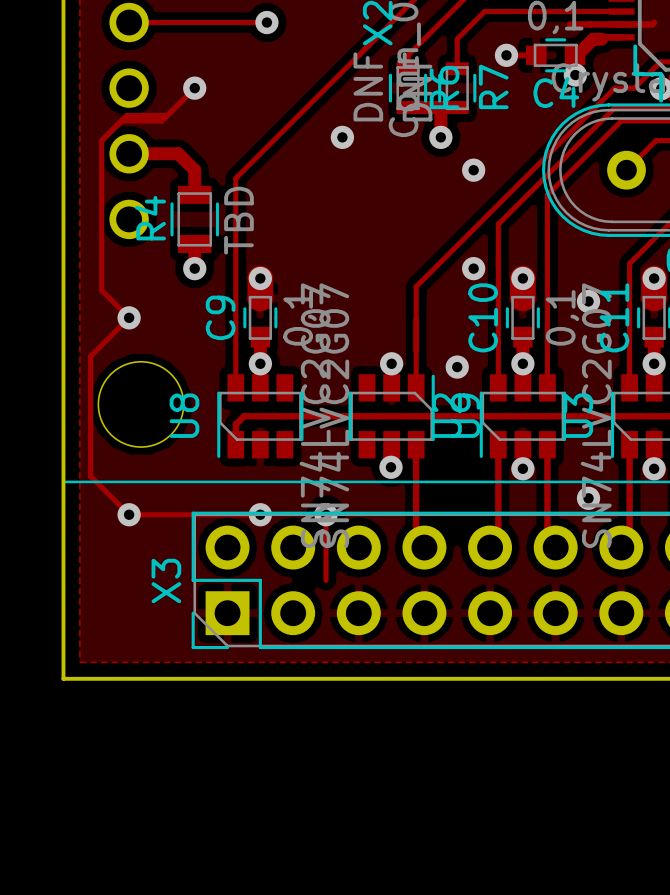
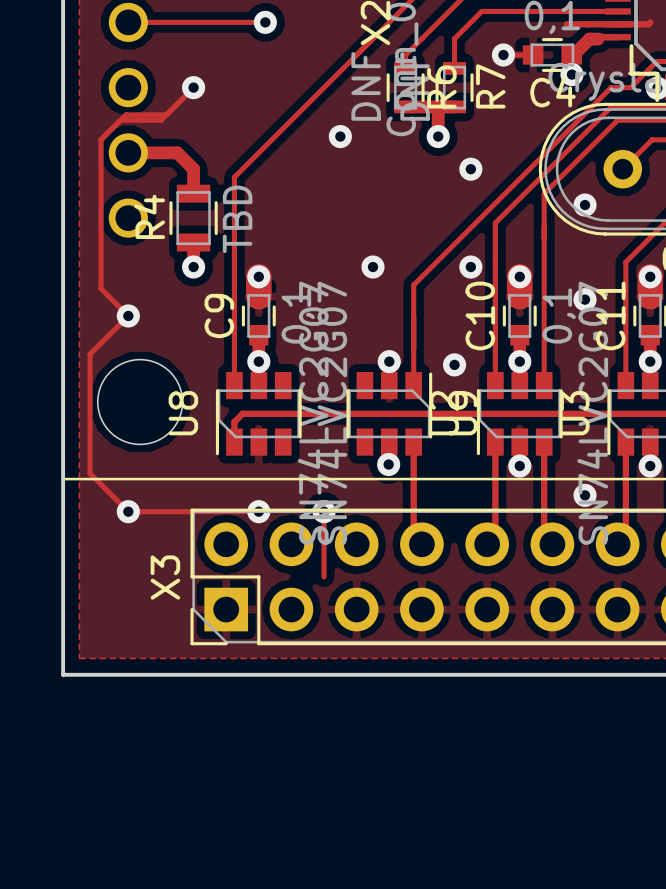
via: none -> (585, 205)
via: none -> (372, 267)

